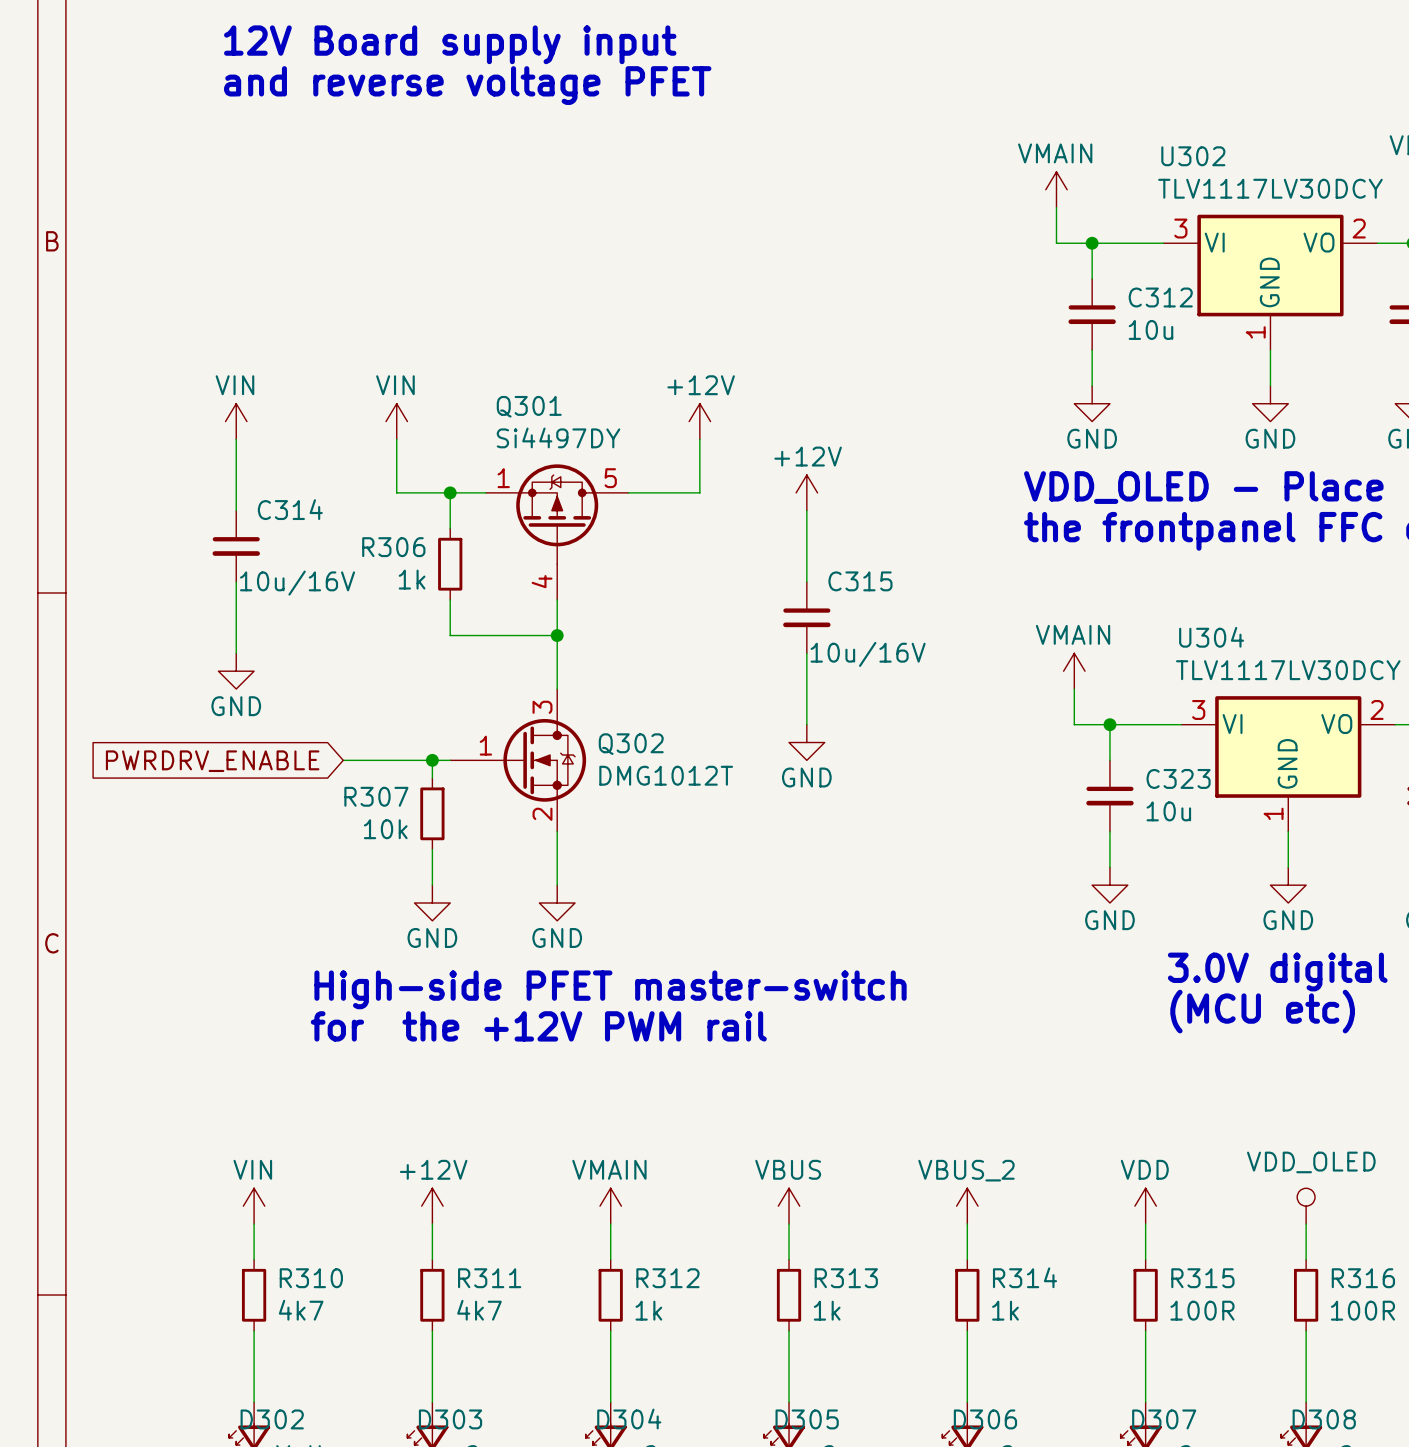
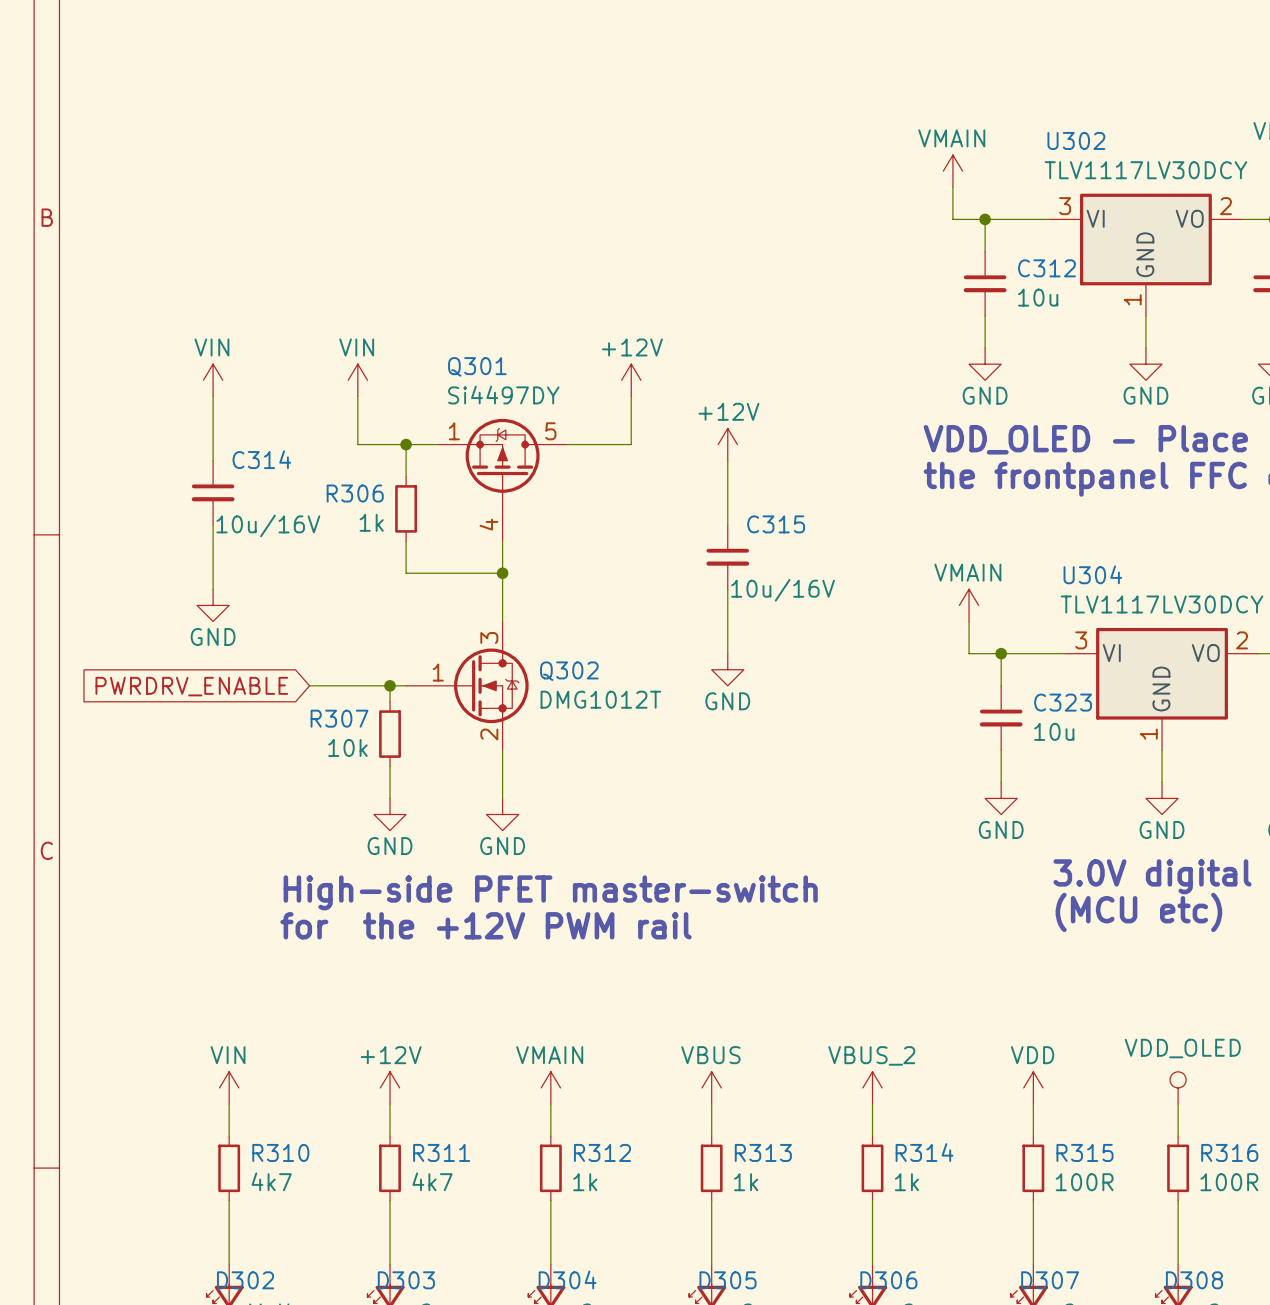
text: 12V Board supply input (450, 44) -> none
text: and reverse voltage PFET (467, 85) -> none

